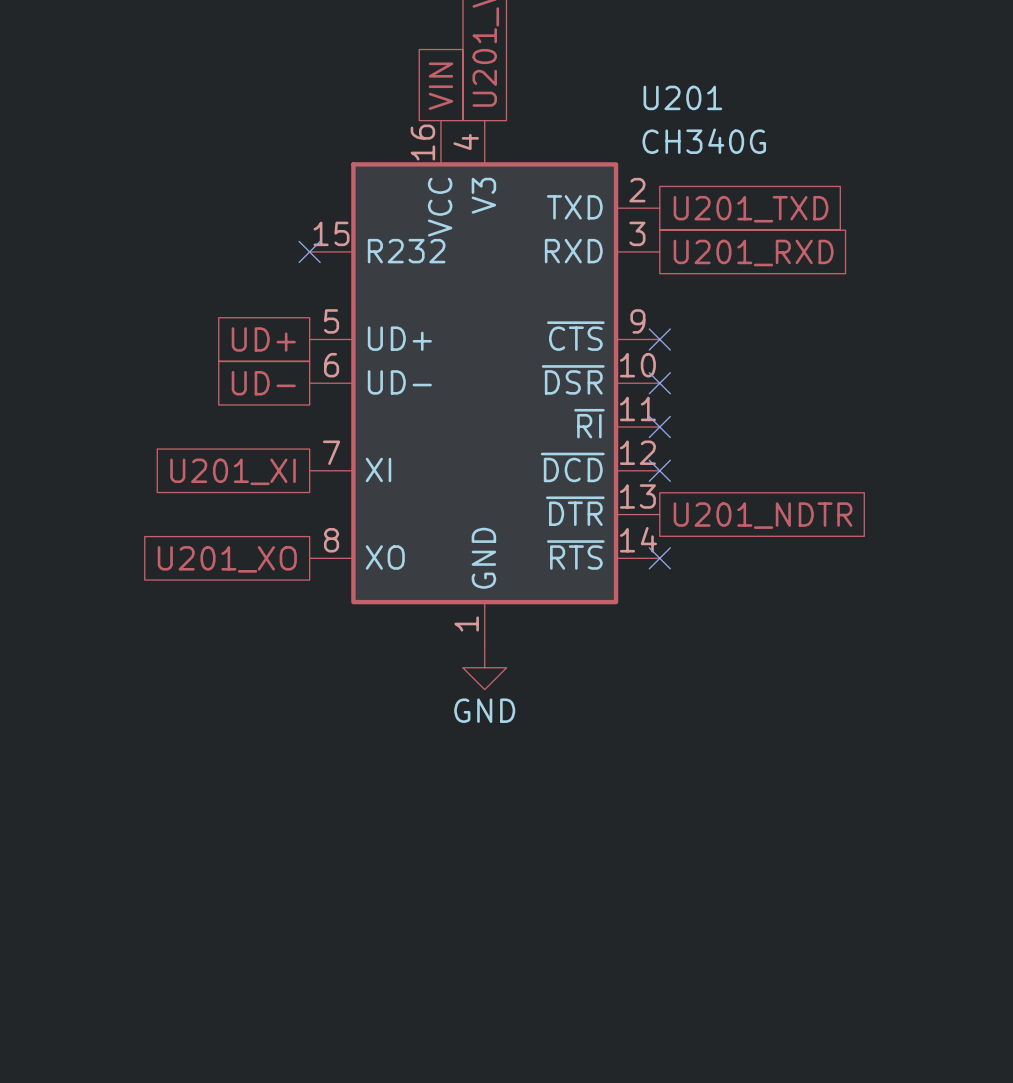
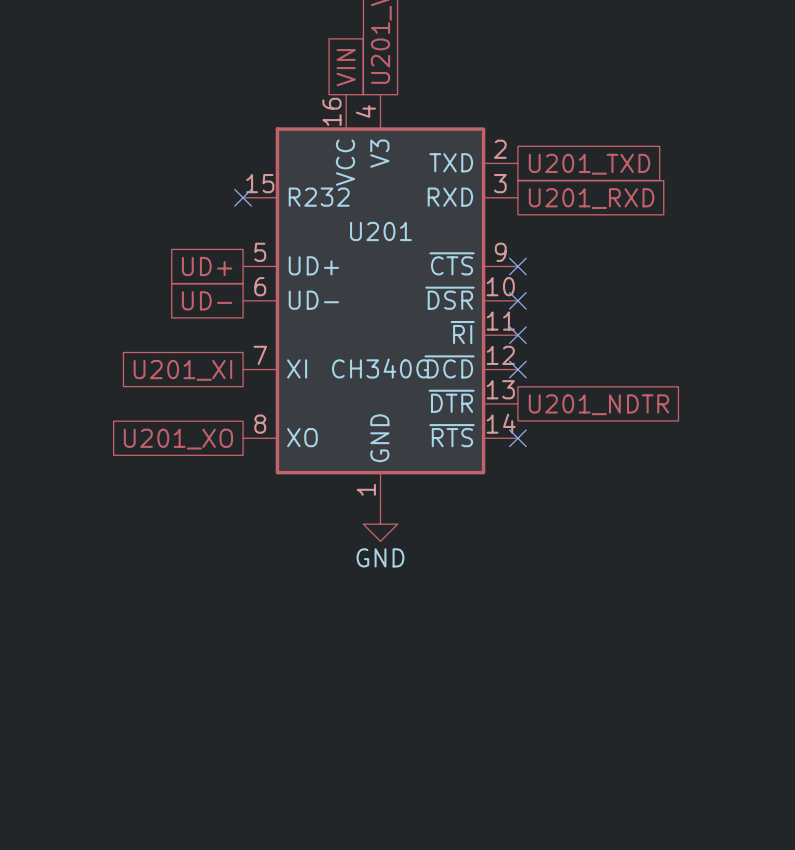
U201 name position: U201 (682, 97) -> U201 (380, 231)
U201 value position: CH340G (704, 141) -> CH340G (380, 368)

